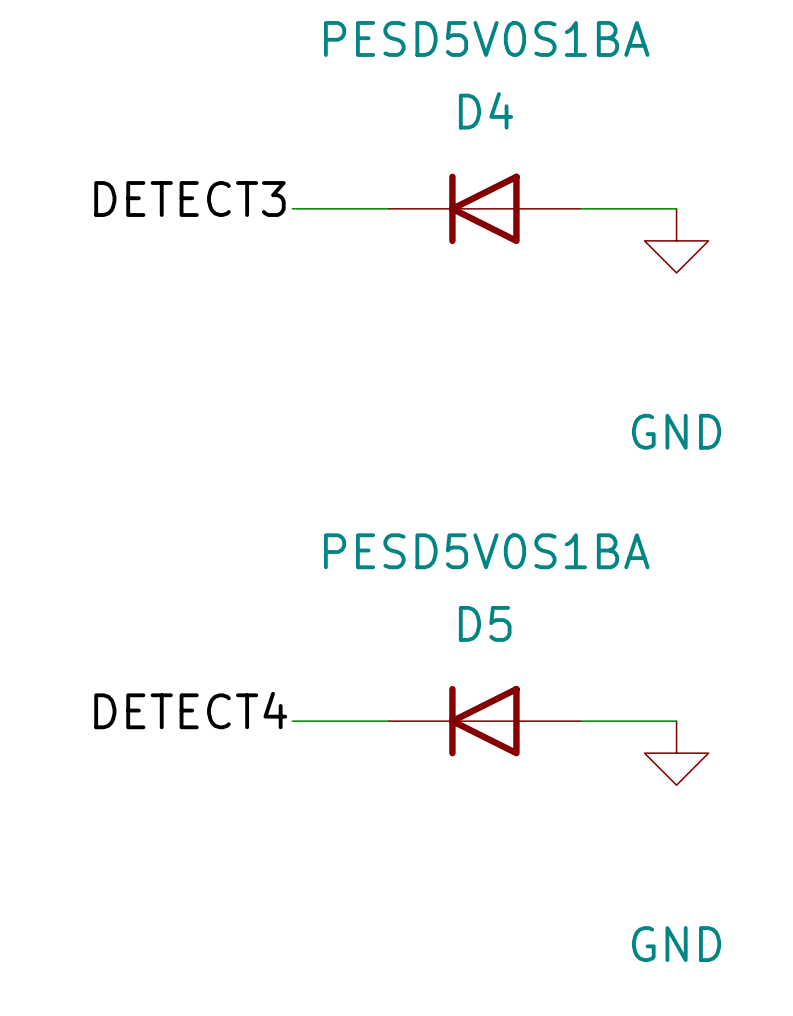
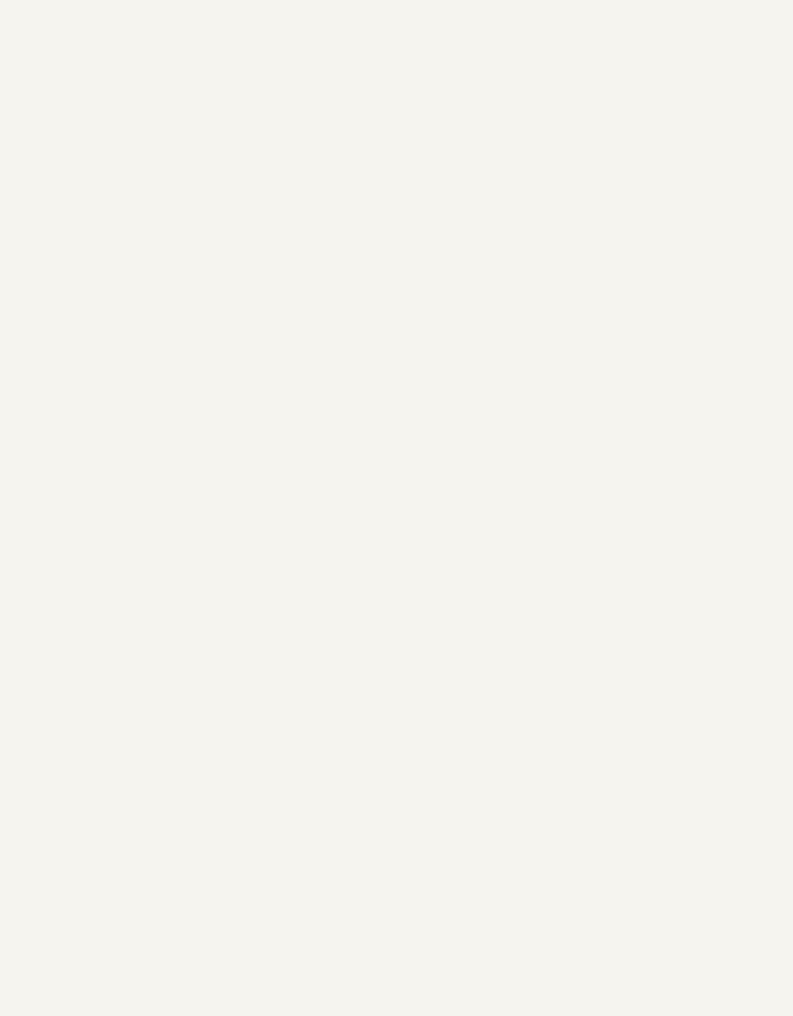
label: DETECT3 (189, 199) -> none
wire: (292, 208) (388, 208) -> none
D4: PESD5V0S1BA (484, 208) -> none
wire: (580, 208) (676, 208) -> none
power symbol: GND (676, 240) -> none
label: DETECT4 (190, 710) -> none
wire: (292, 721) (388, 721) -> none
D5: PESD5V0S1BA (484, 721) -> none
wire: (580, 721) (676, 721) -> none
power symbol: GND (676, 753) -> none

